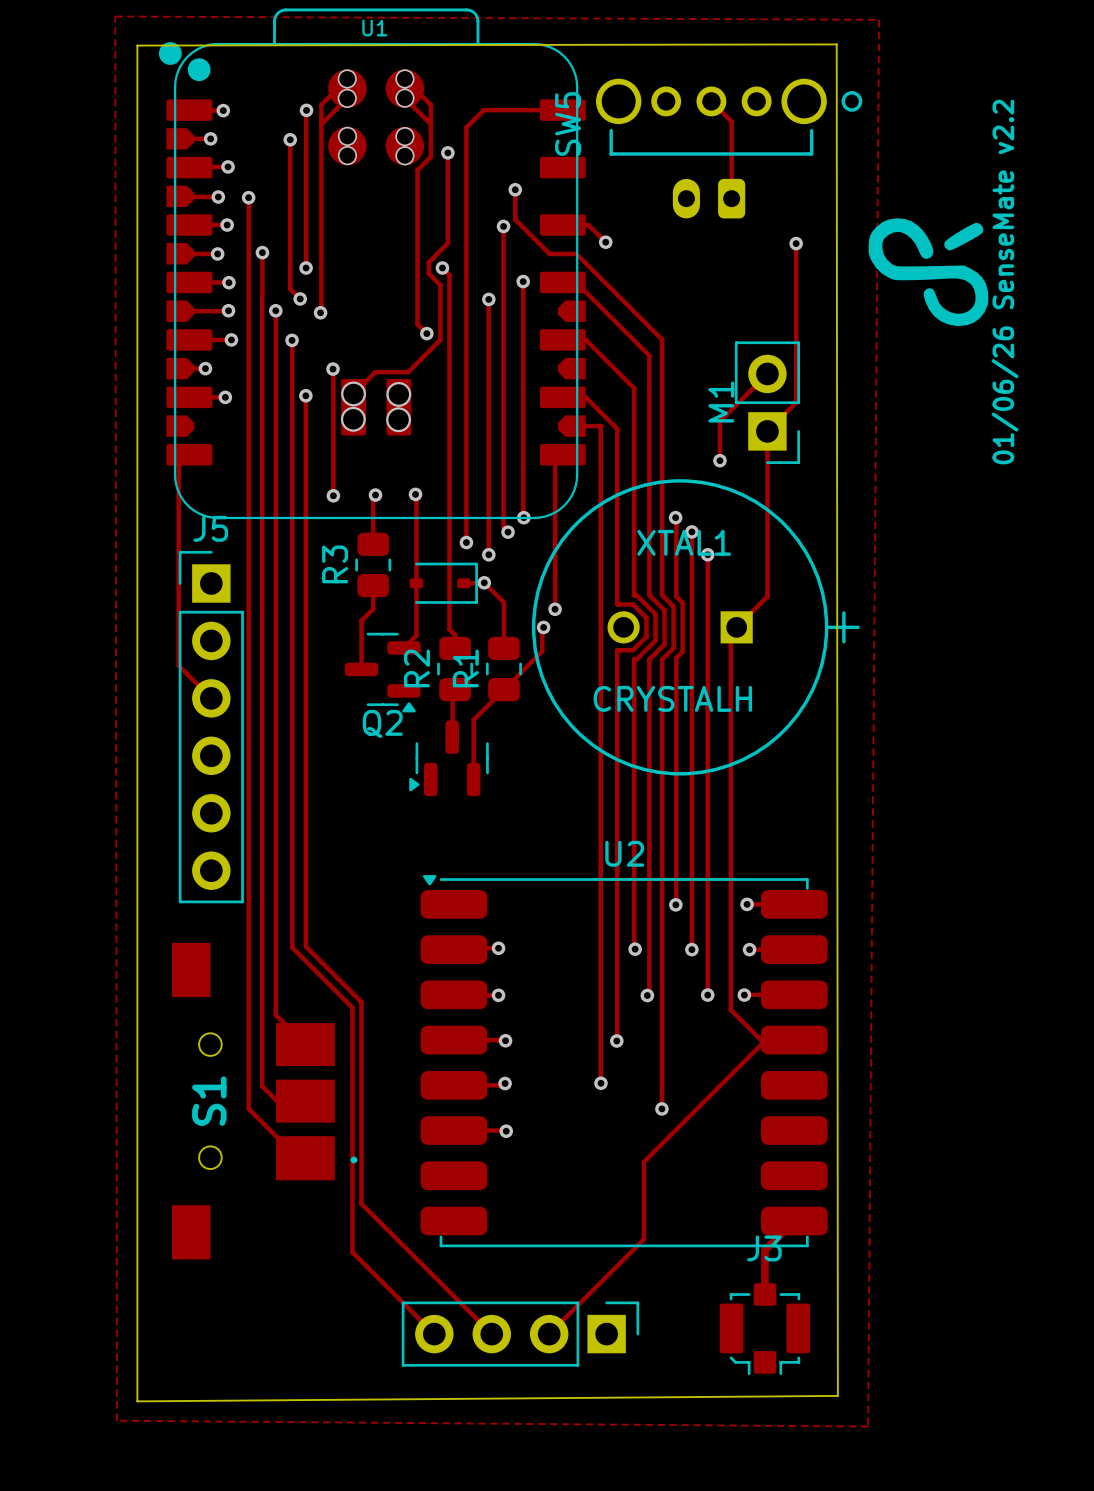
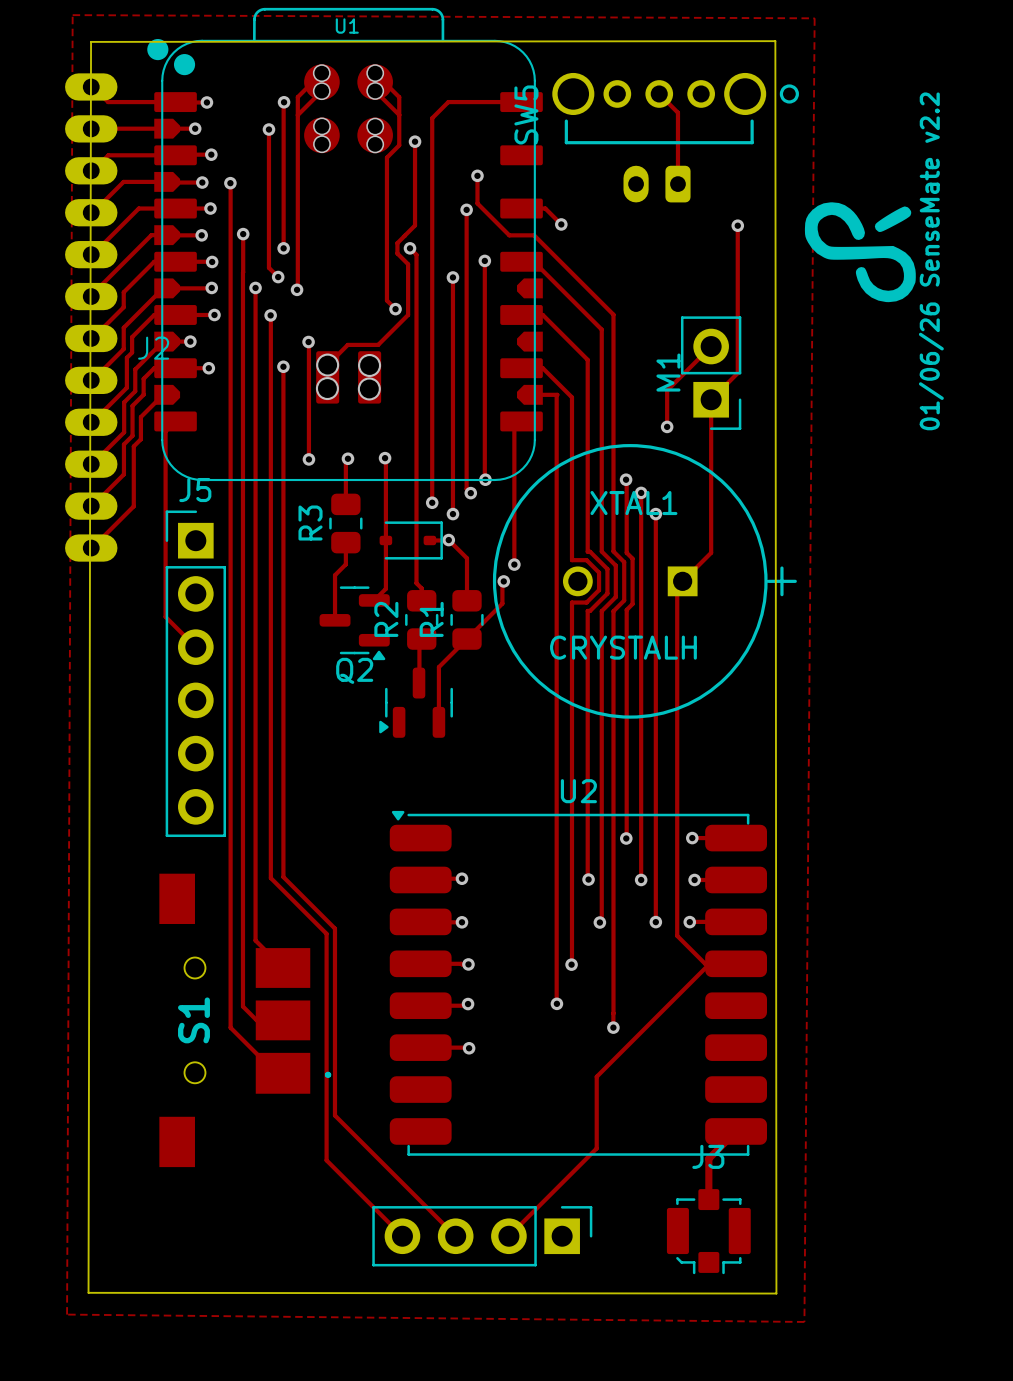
zone outline: (879, 19) (115, 16) (117, 1420) (868, 1426) -> (814, 18) (72, 15) (67, 1314) (804, 1321)
board edge: (836, 44) (137, 45) (137, 1401) (837, 1395) -> (775, 41) (91, 41) (88, 1292) (776, 1293)
track: none -> (93, 86) (108, 102) (175, 102)
track: none -> (93, 128) (167, 128)
track: none -> (175, 155) (108, 155) (92, 170)
track: none -> (167, 181) (123, 181) (92, 212)
track: none -> (175, 208) (138, 208) (92, 254)
track: none -> (167, 235) (151, 235) (92, 293) (92, 296)
track: none -> (175, 261) (154, 261) (123, 292) (123, 307) (92, 338)
track: none -> (167, 288) (163, 288) (123, 327) (123, 349) (92, 380)
track: none -> (175, 314) (154, 314) (132, 337) (132, 352) (126, 357) (126, 387) (92, 422)
J2: none -> (91, 317)
track: none -> (167, 341) (163, 341) (135, 369) (135, 391) (124, 402) (124, 432) (92, 464)
track: none -> (175, 368) (154, 368) (143, 378) (143, 394) (132, 405) (132, 435) (123, 444) (123, 474) (92, 506)
track: none -> (167, 394) (163, 394) (140, 417) (140, 439) (133, 446) (133, 506) (92, 548)

